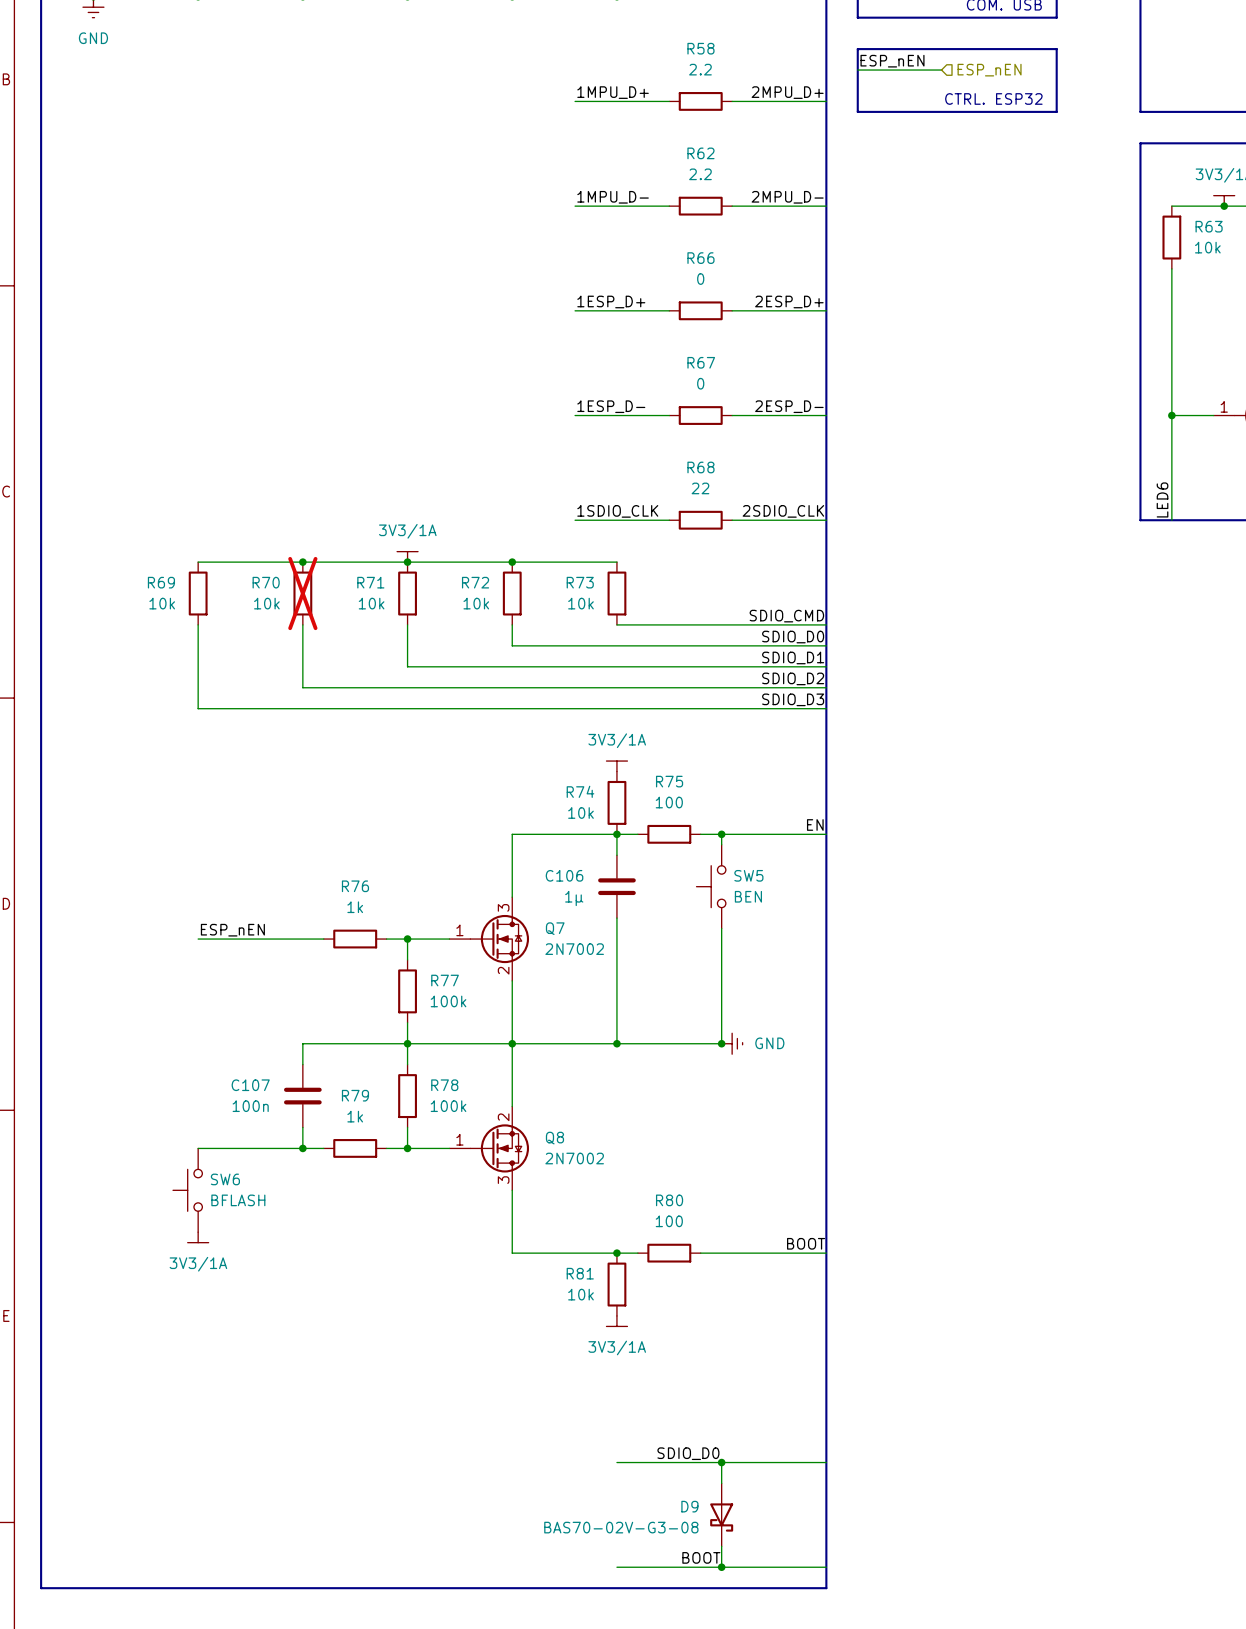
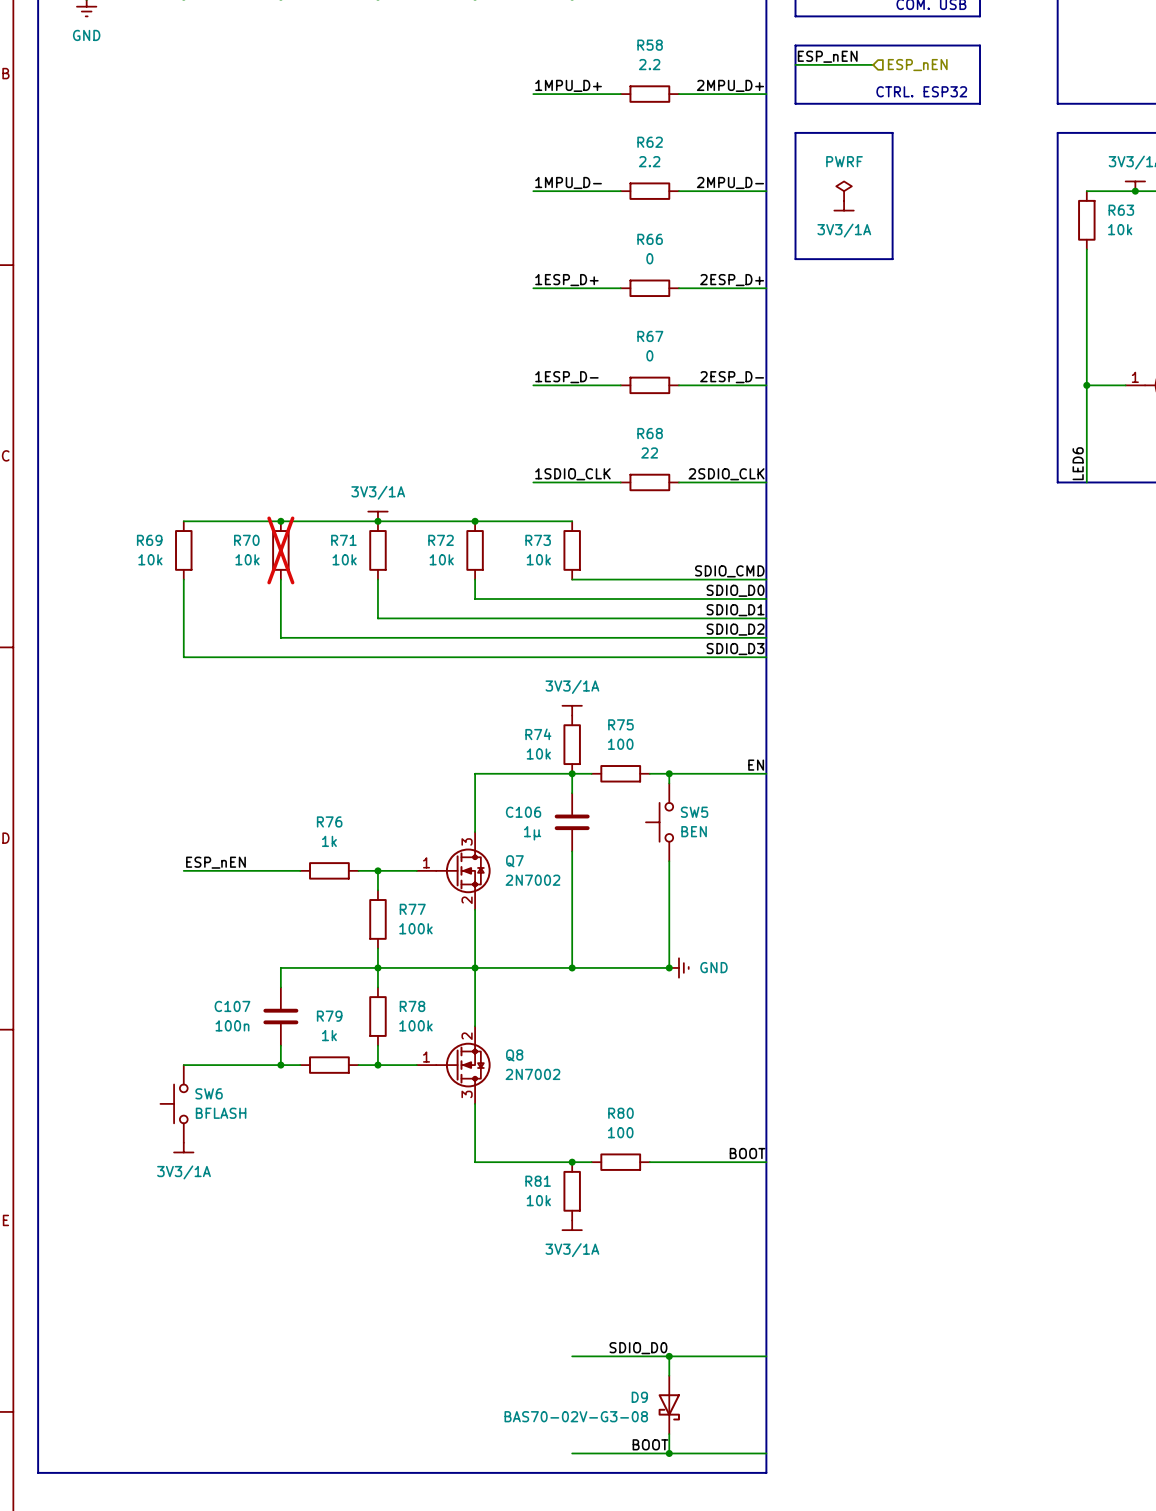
line: none -> (795, 132) (892, 132) (892, 259) (795, 259) (795, 132)
power symbol: none -> PWRF (844, 191)
power symbol: none -> 3V3/1A (844, 205)

